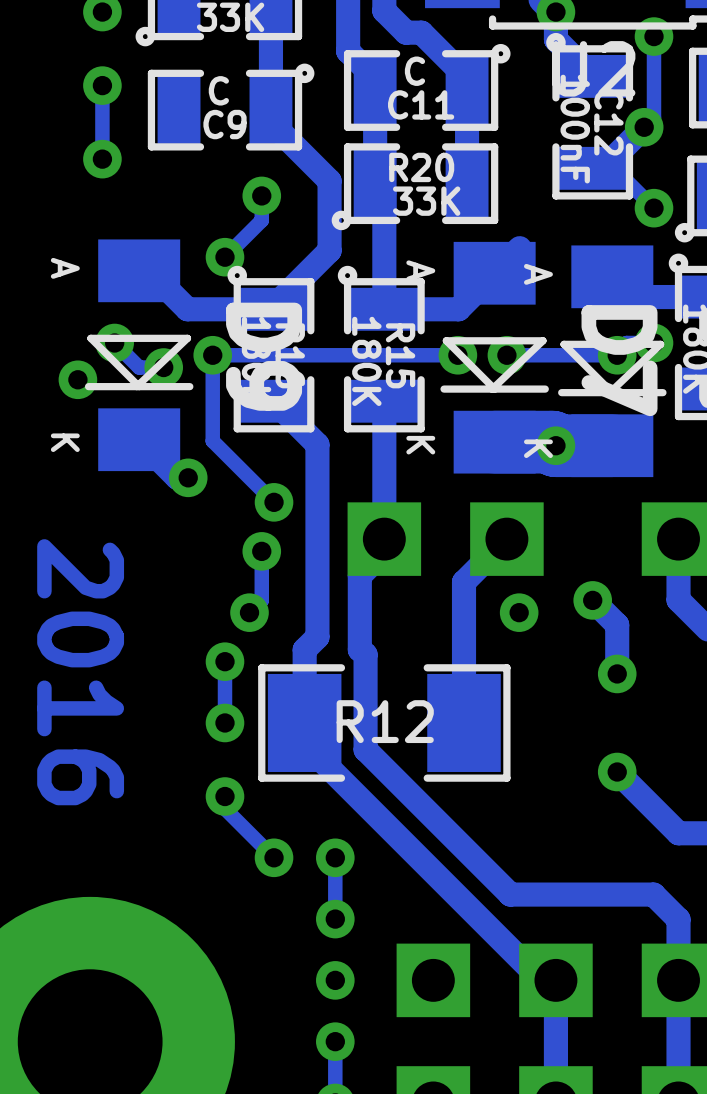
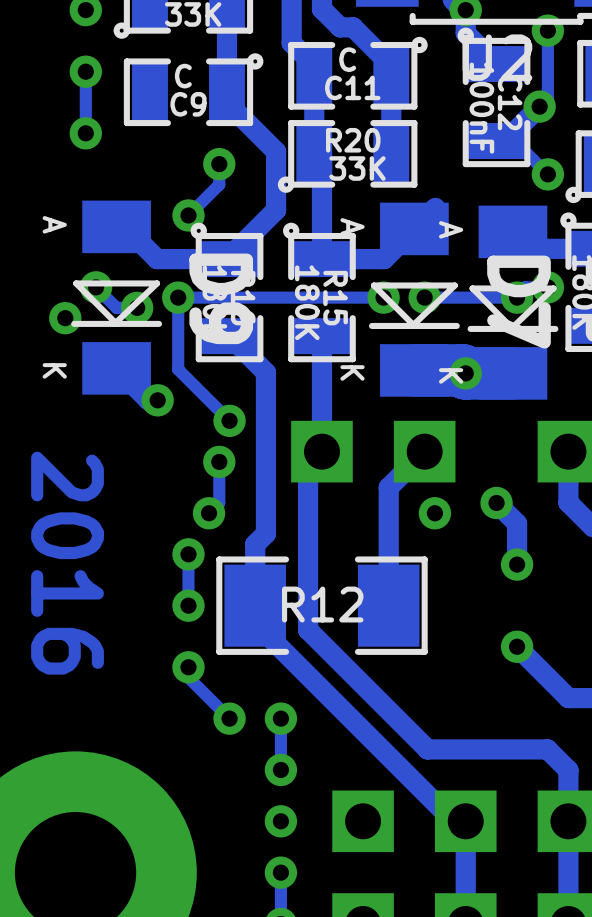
track: (367, 568) (359, 575) (359, 649) -> none
track: (360, 649) (365, 654) (365, 749) (367, 751) -> (308, 475) (308, 629)

